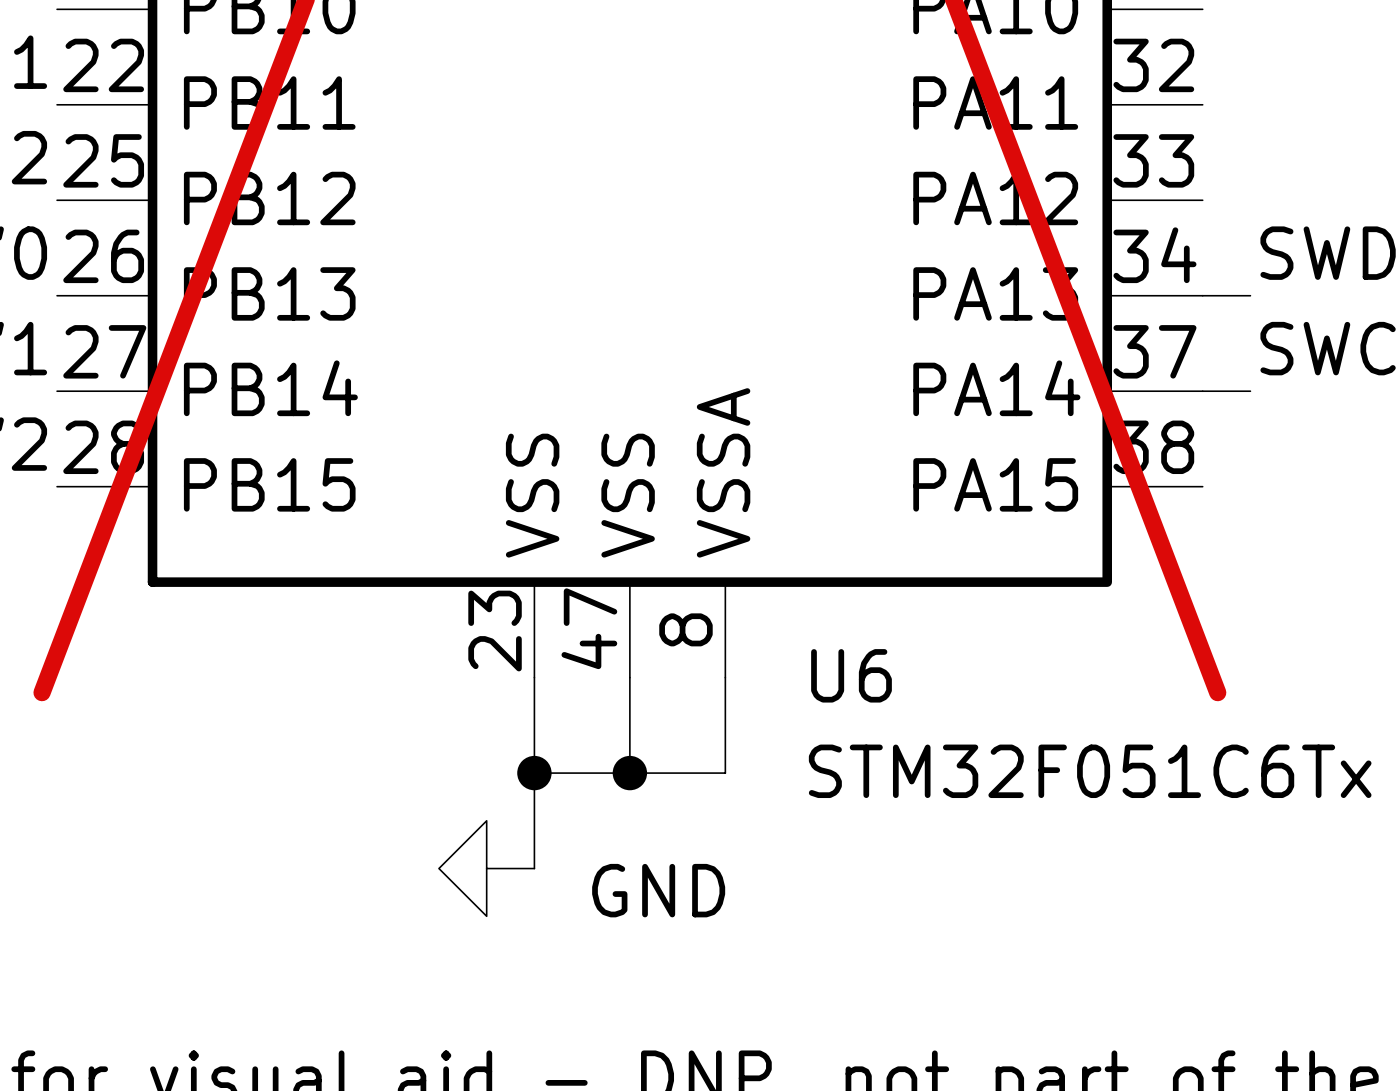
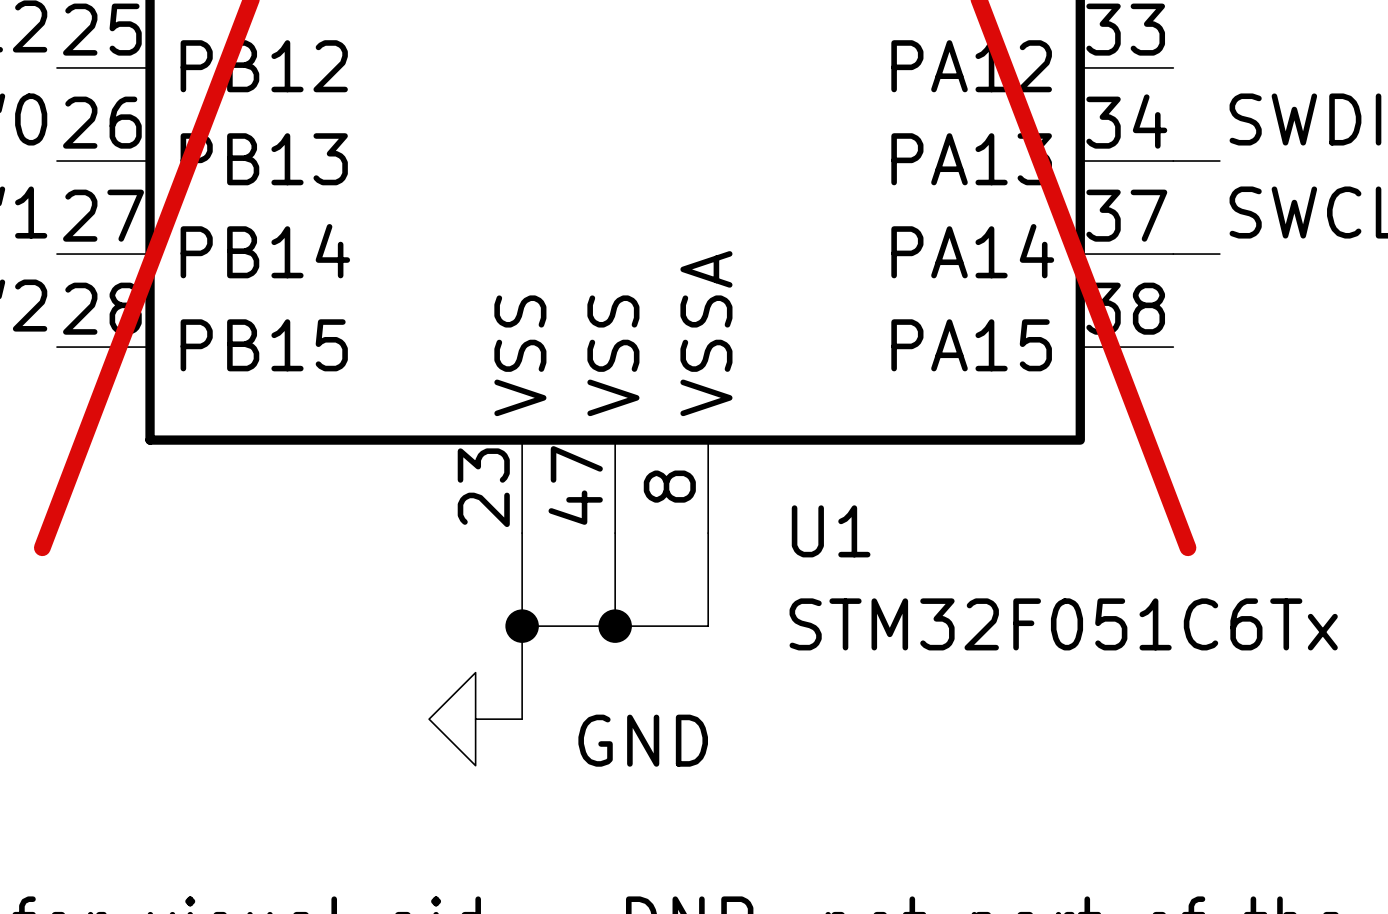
U6 name: U6 (851, 675) -> U1 (831, 531)

